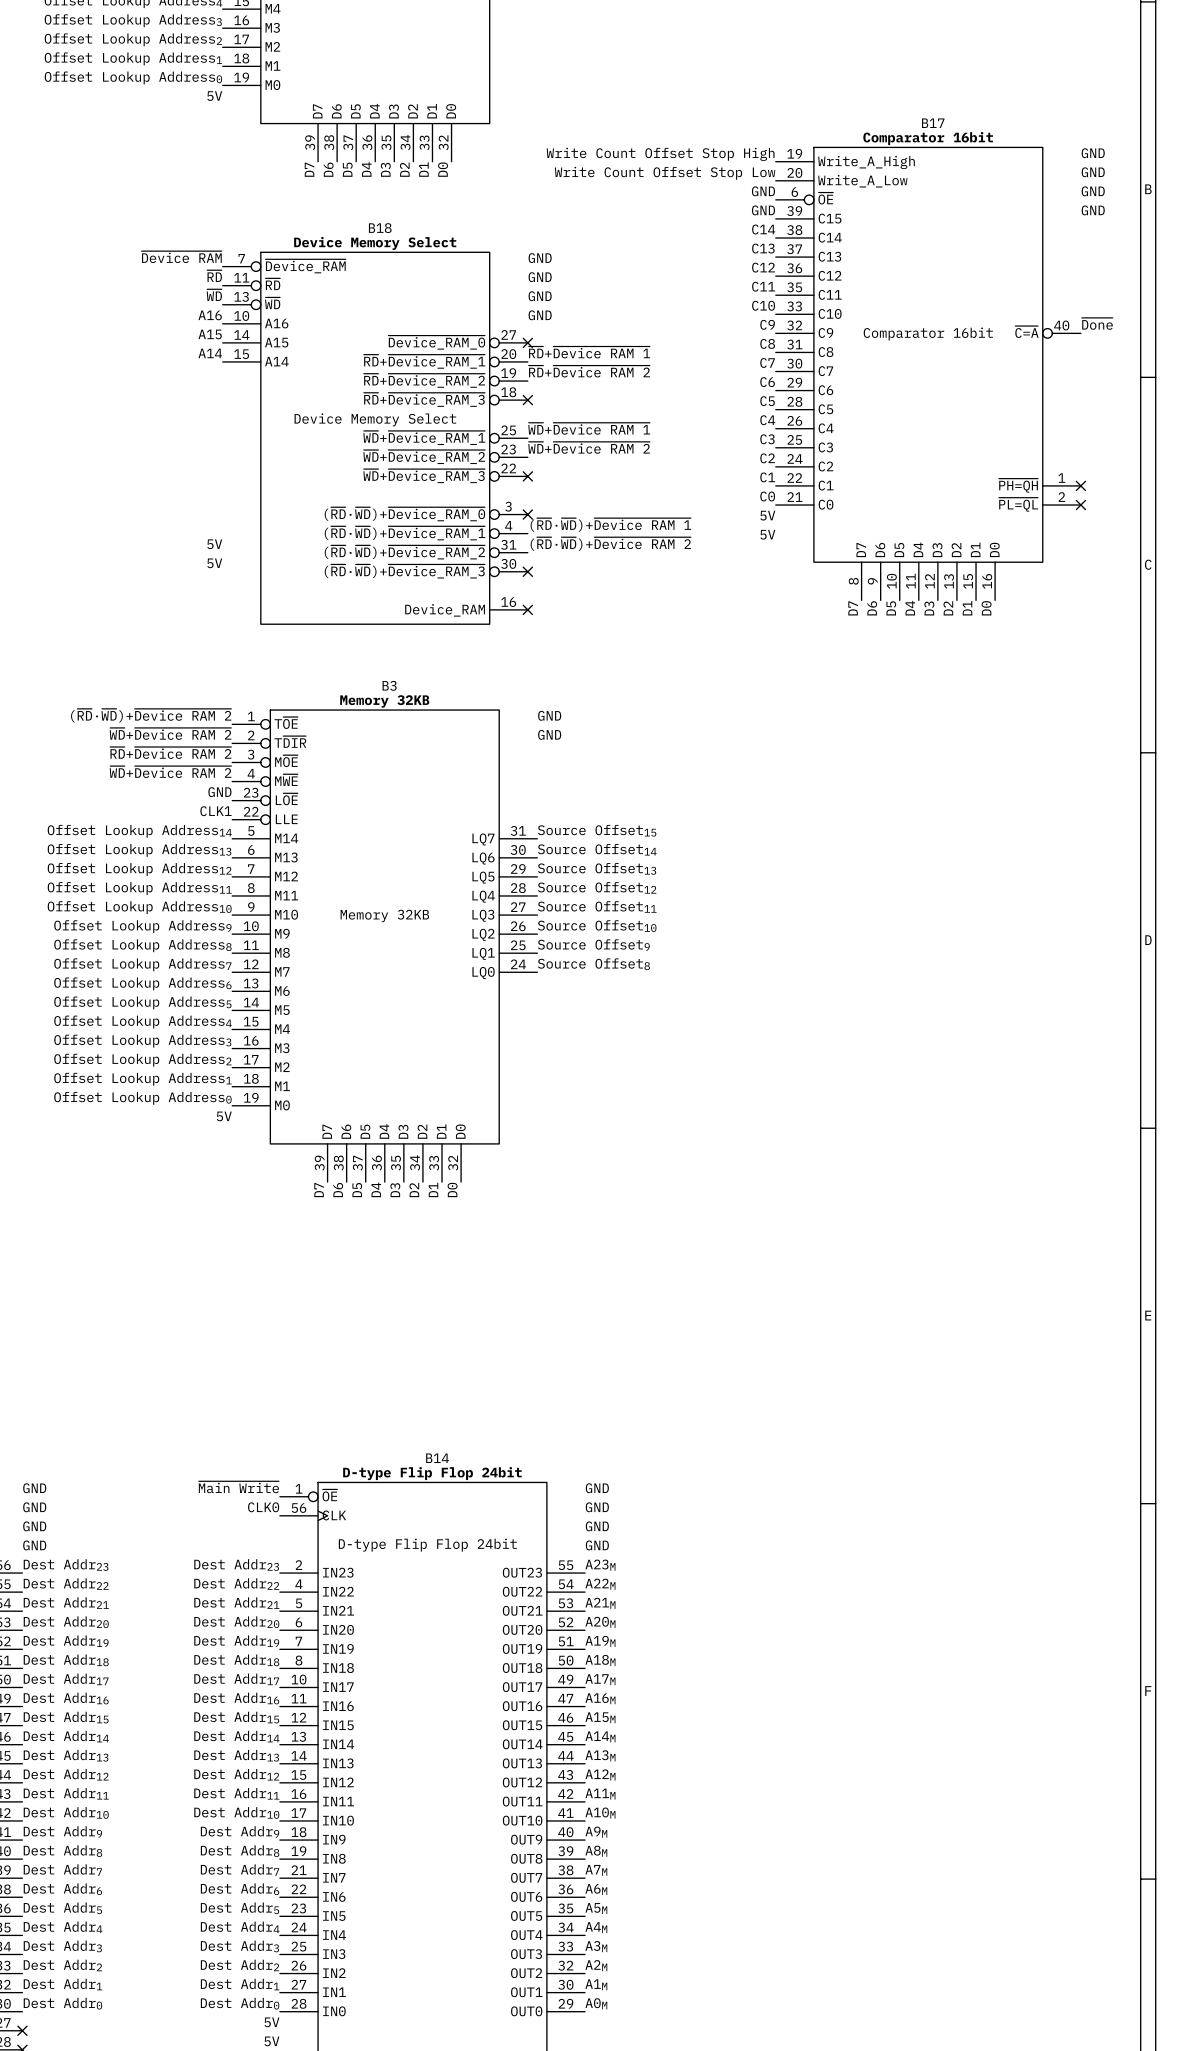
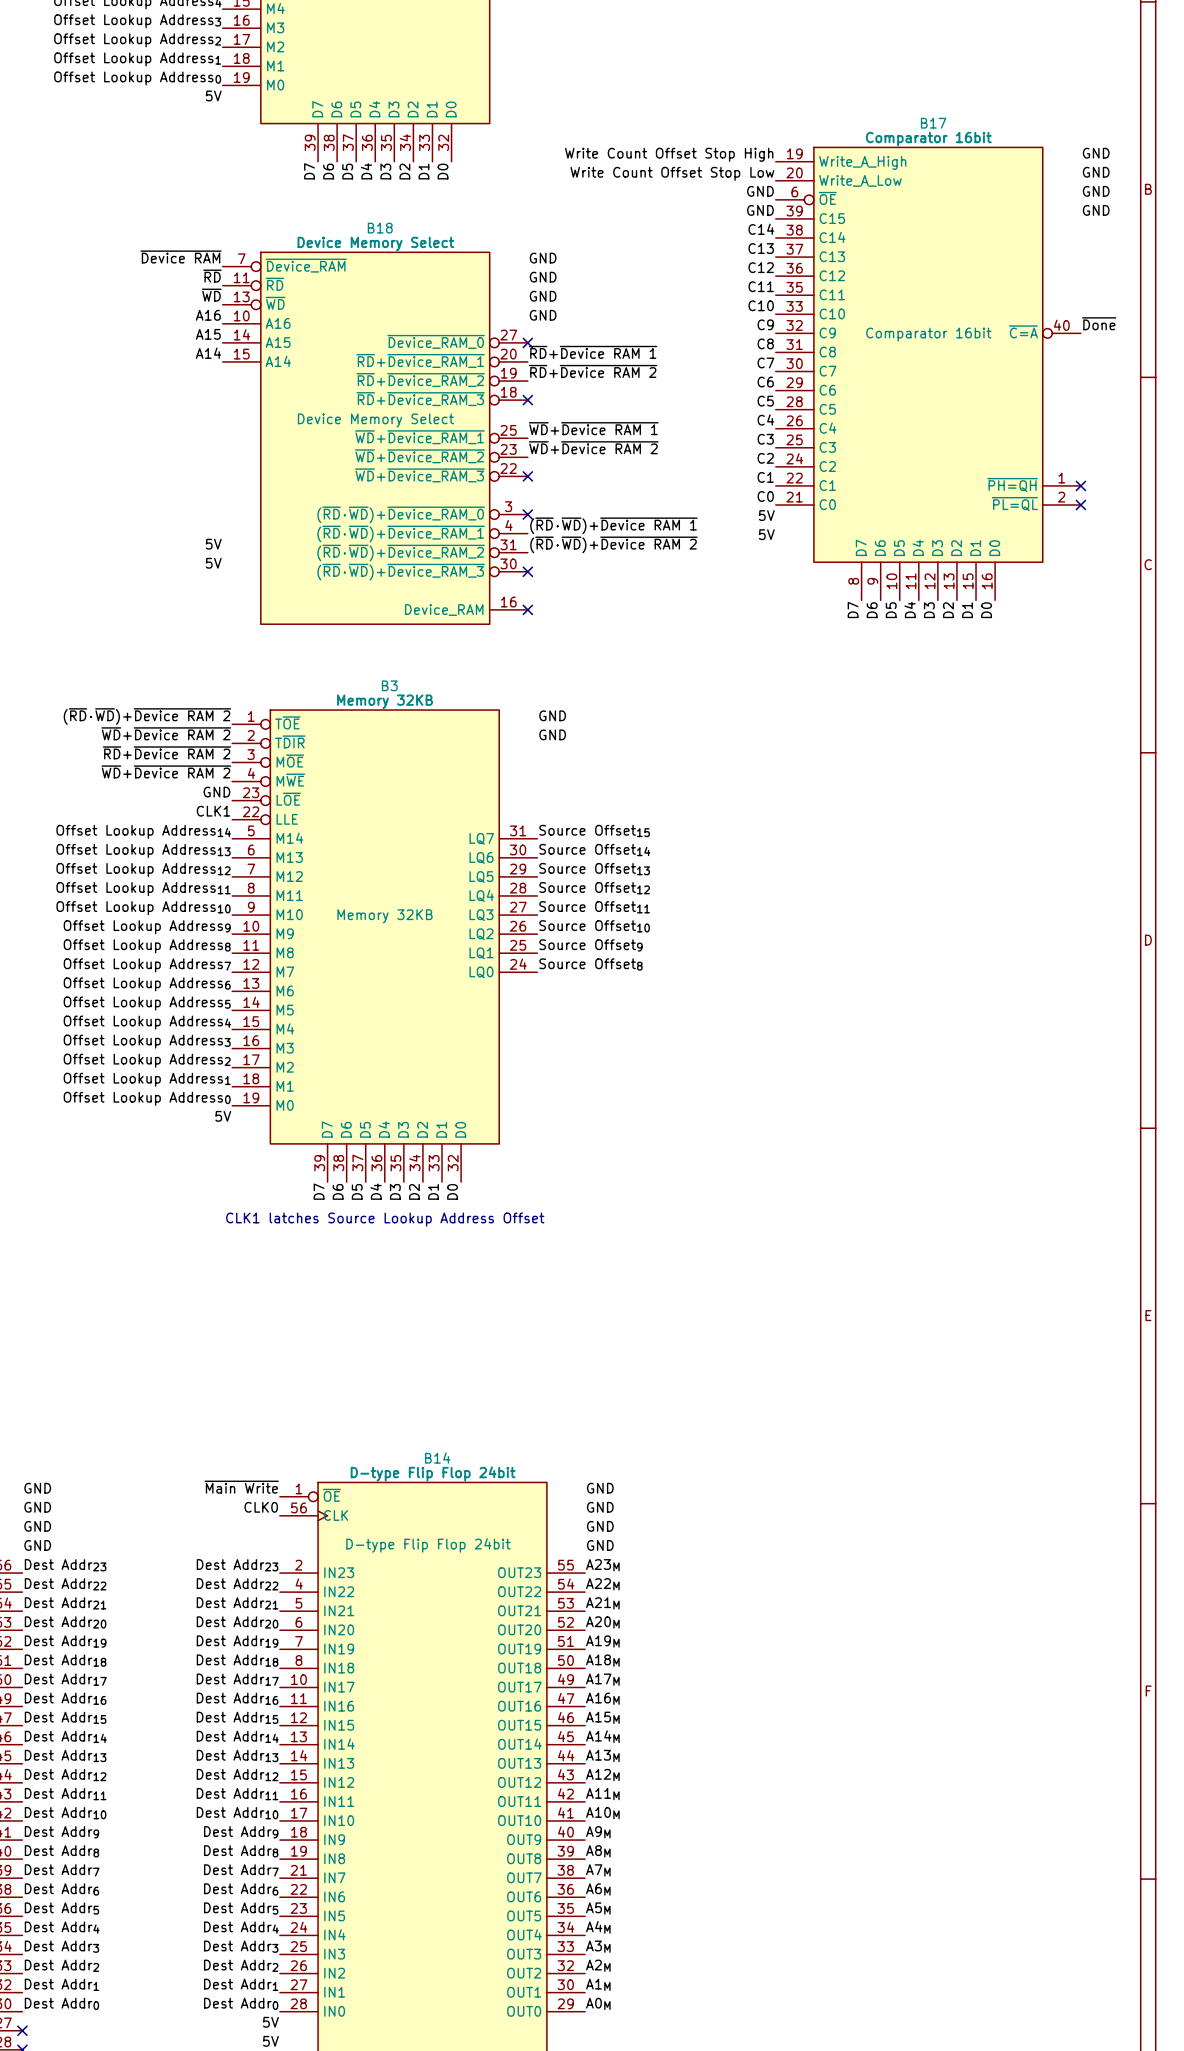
text: none -> CLK1 latches Source Lookup Address Offset (385, 1219)

